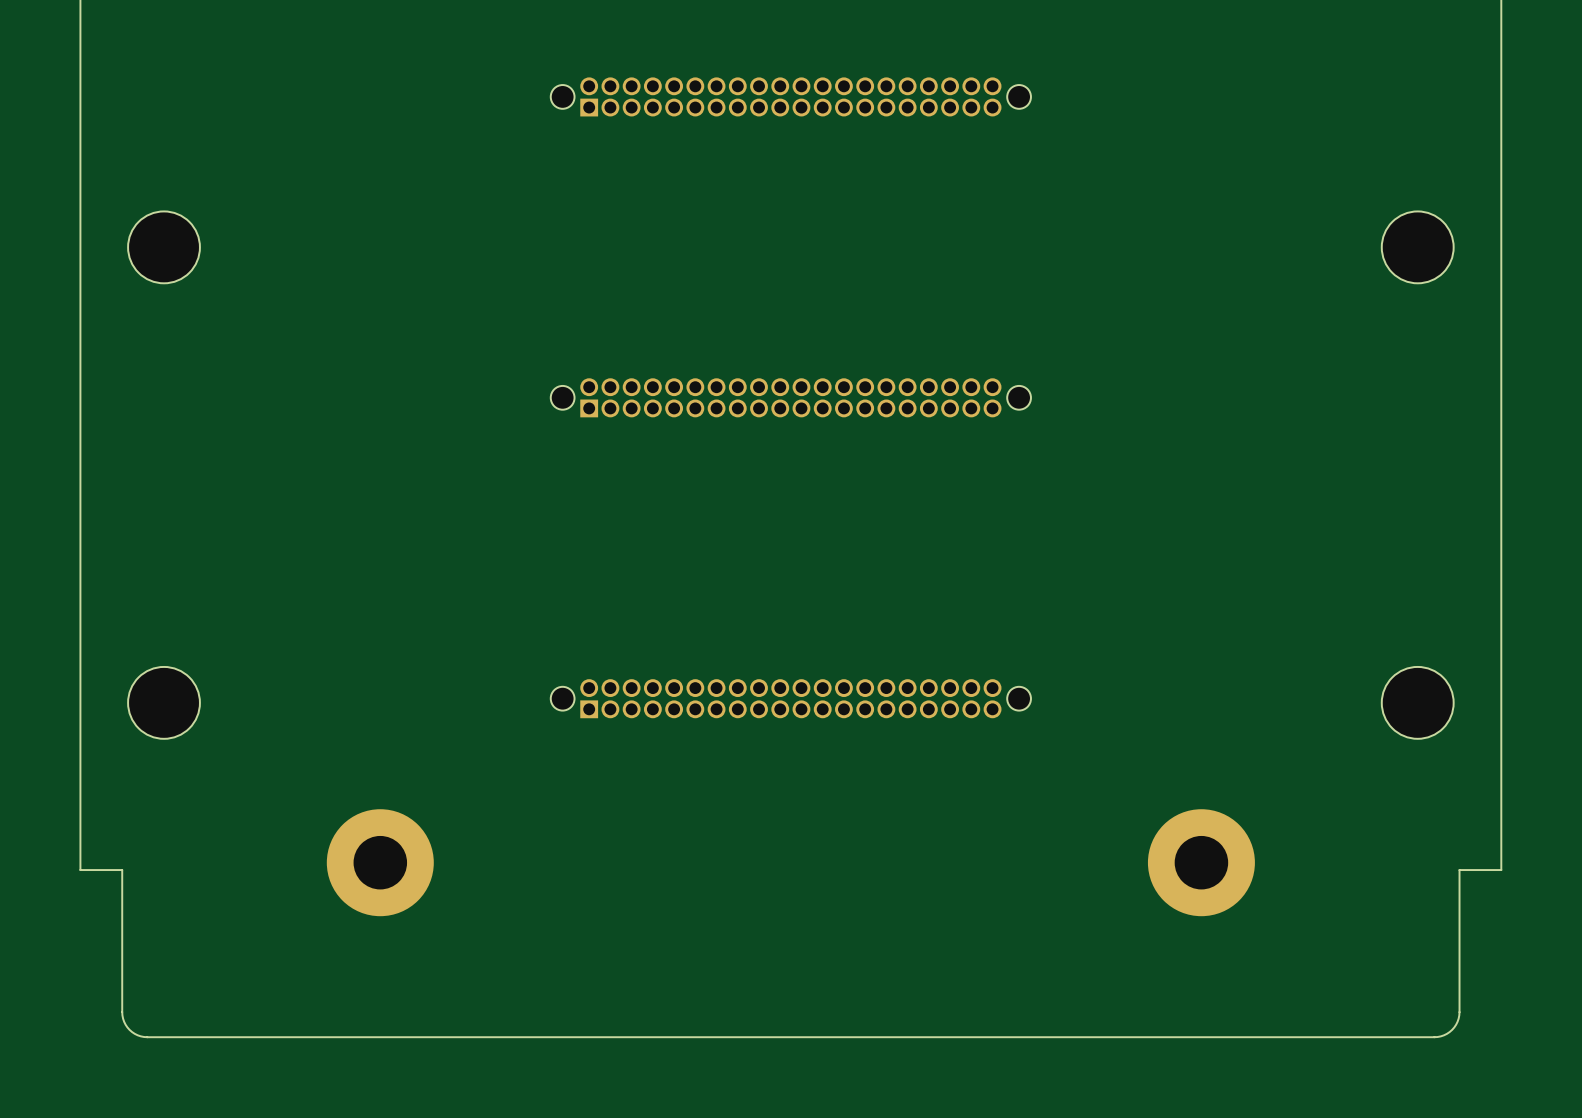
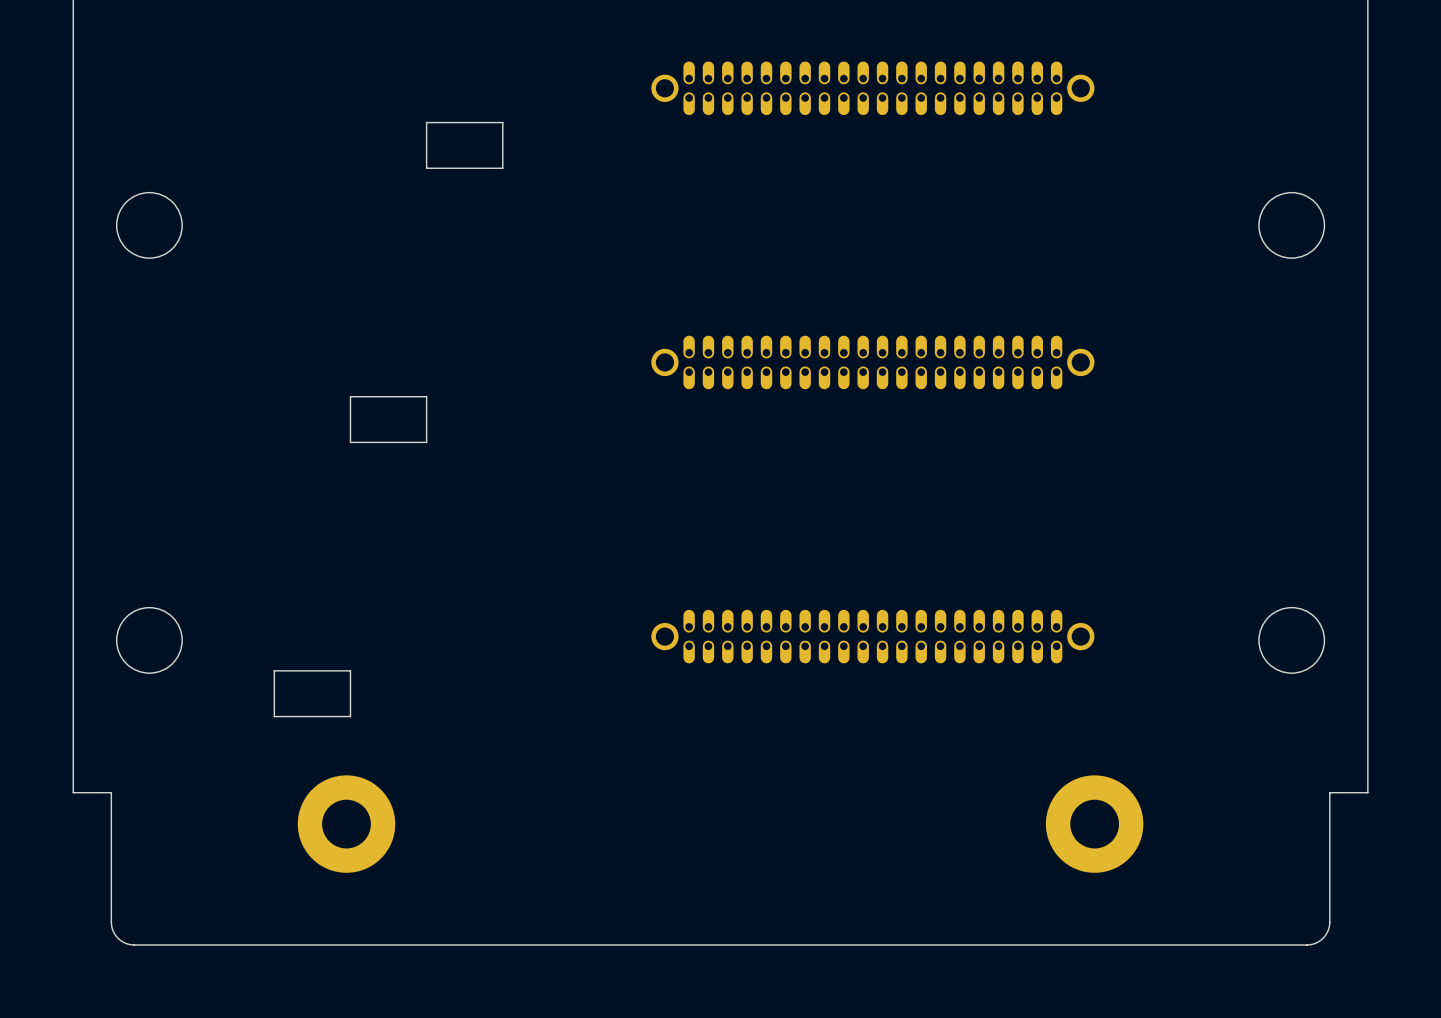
part: (790, 96) -> none
part: none -> (872, 88)
board edge: none -> (502, 122) (426, 122) (426, 168) (502, 168) (502, 122)
part: (790, 397) -> none
part: none -> (872, 362)
board edge: none -> (426, 396) (426, 442) (350, 442) (350, 396) (426, 396)
part: (790, 698) -> none
part: none -> (872, 636)
board edge: none -> (350, 670) (350, 716) (274, 716) (274, 670) (350, 670)
part position: (380, 862) -> (346, 824)
part position: (1201, 862) -> (1094, 824)

